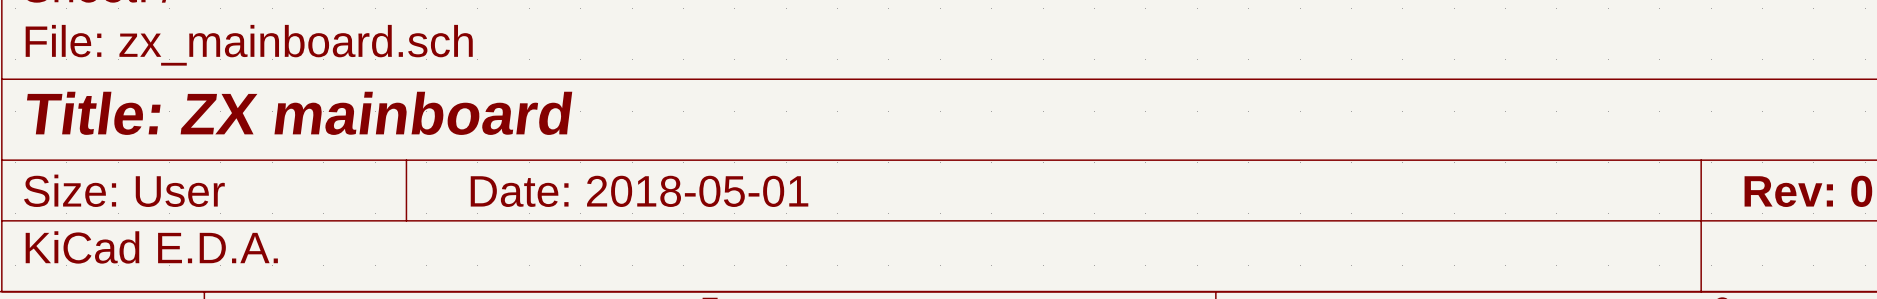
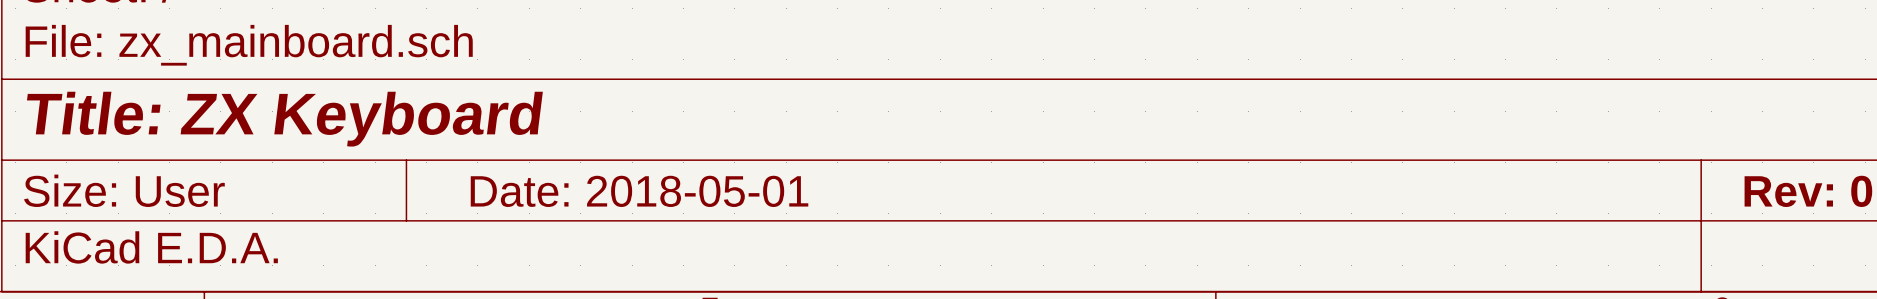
title block: Title: ZX mainboard (299, 113) -> Title: ZX Keyboard (284, 119)

